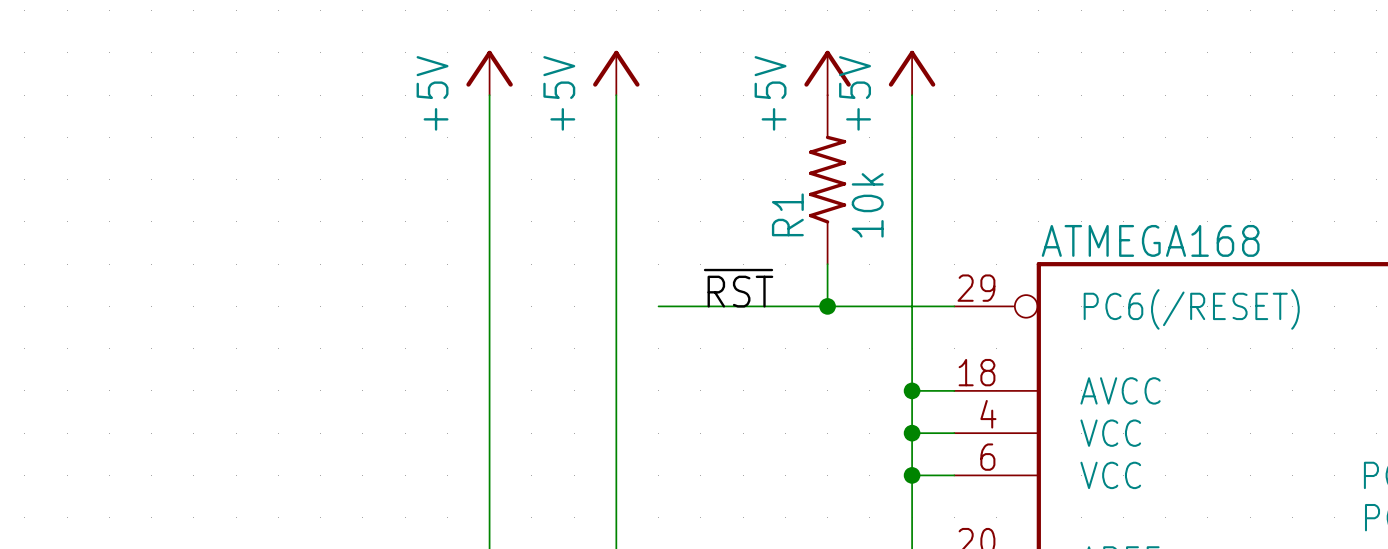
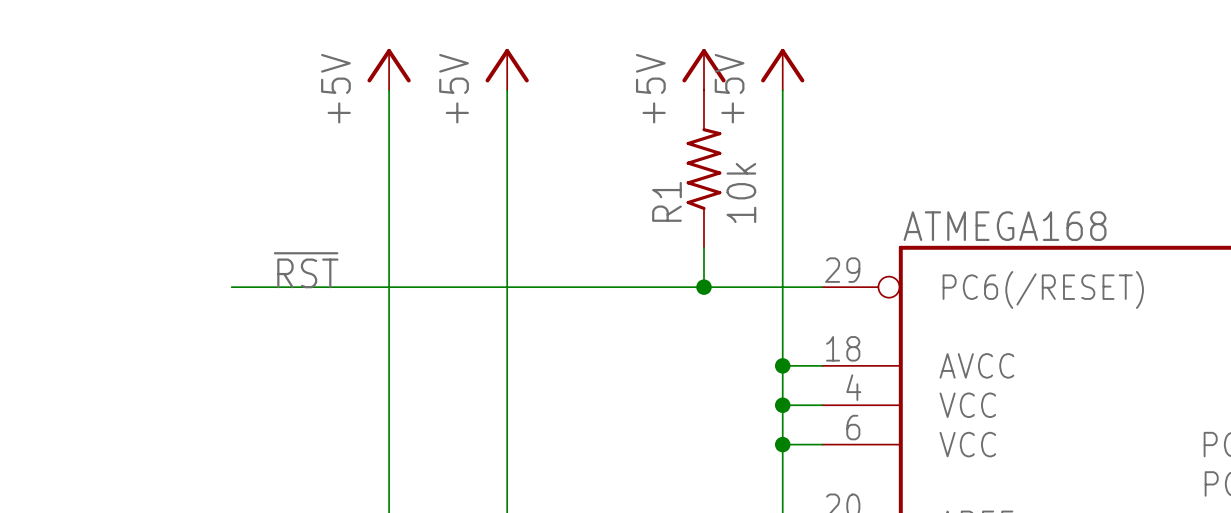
label position: ~{RST} (738, 288) -> ~{RST} (306, 270)
wire: none -> (231, 287) (546, 287)

